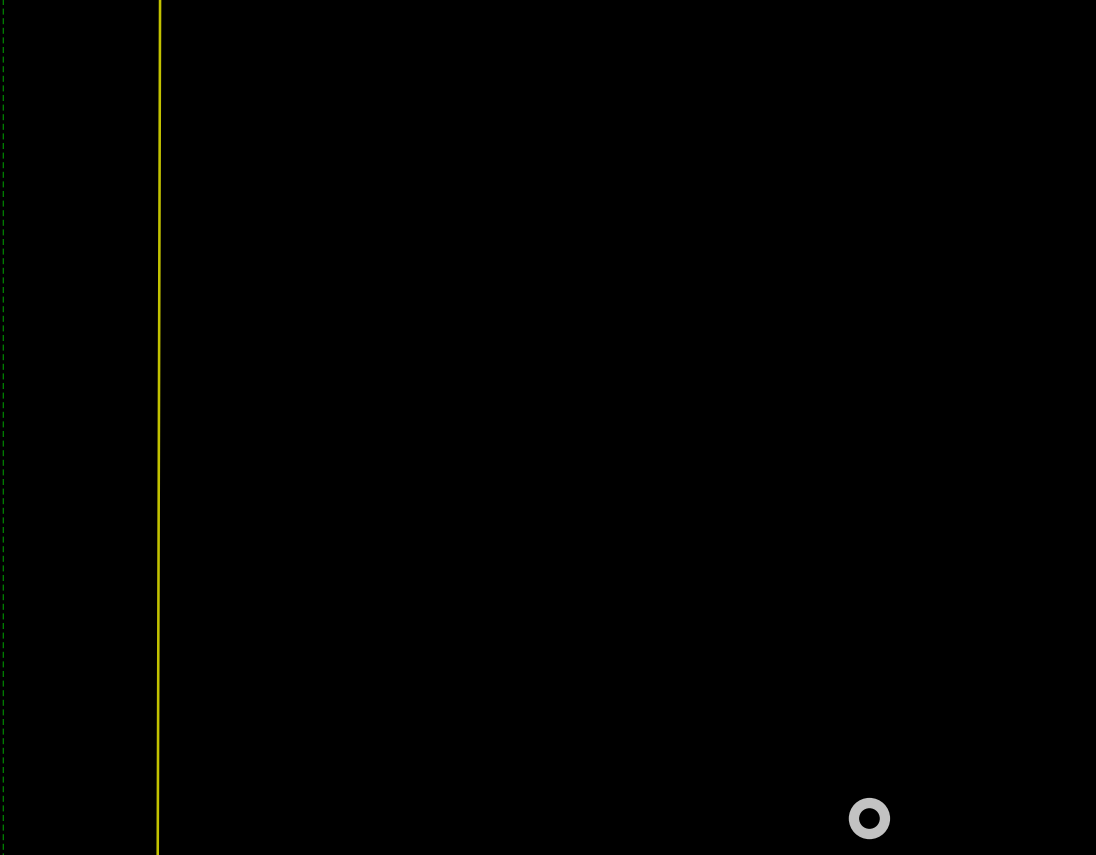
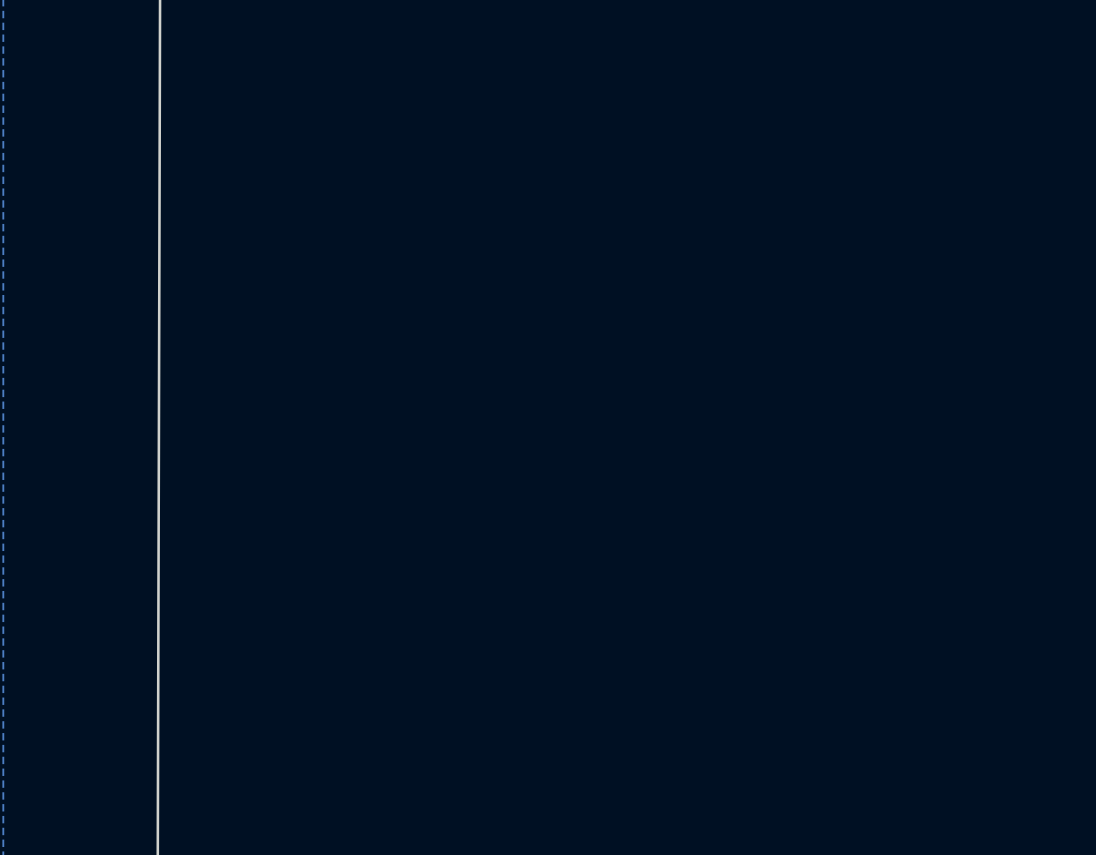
via: (869, 818) -> none

